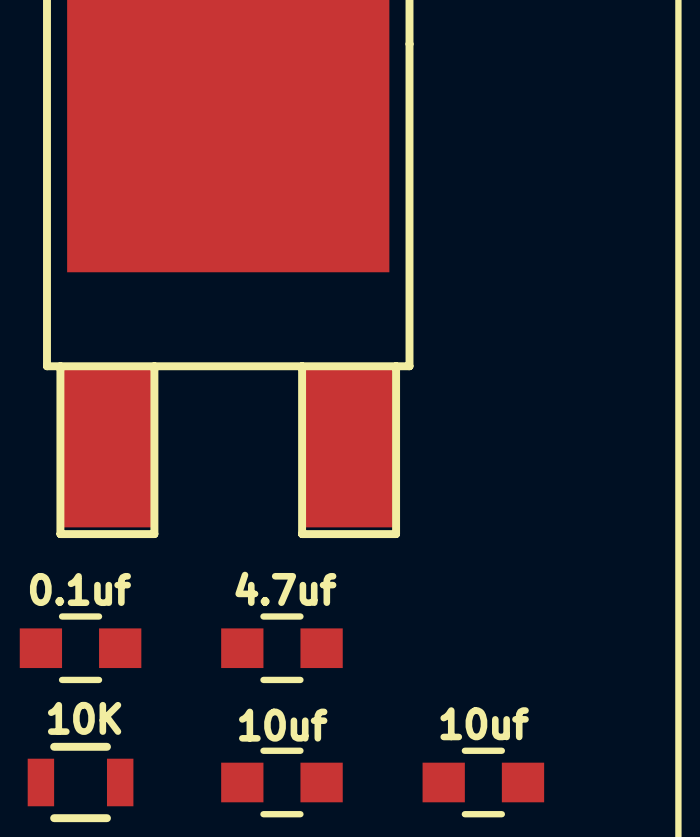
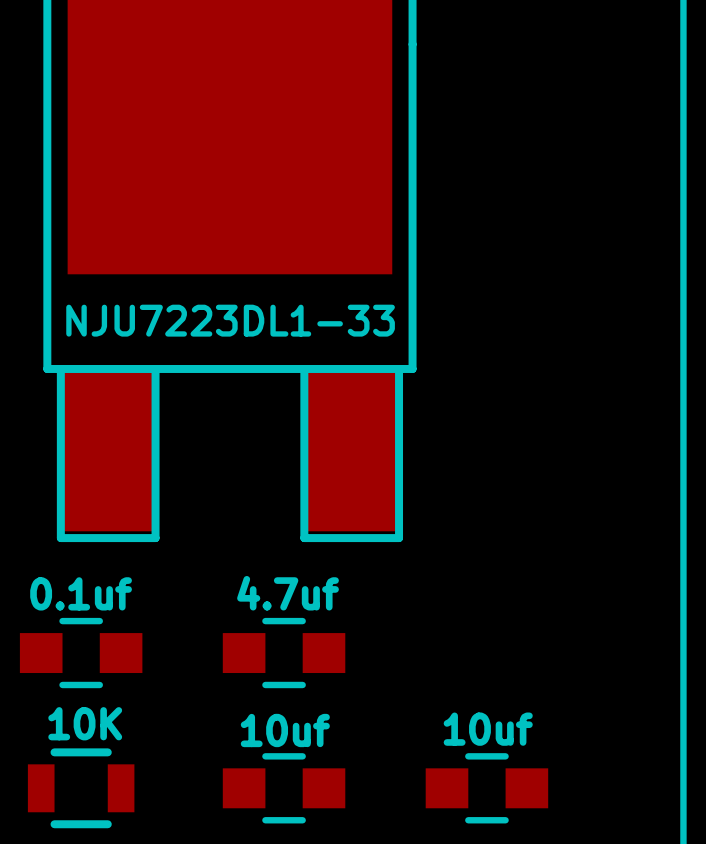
part value: none -> NJU7223DL1-33 (230, 320)

